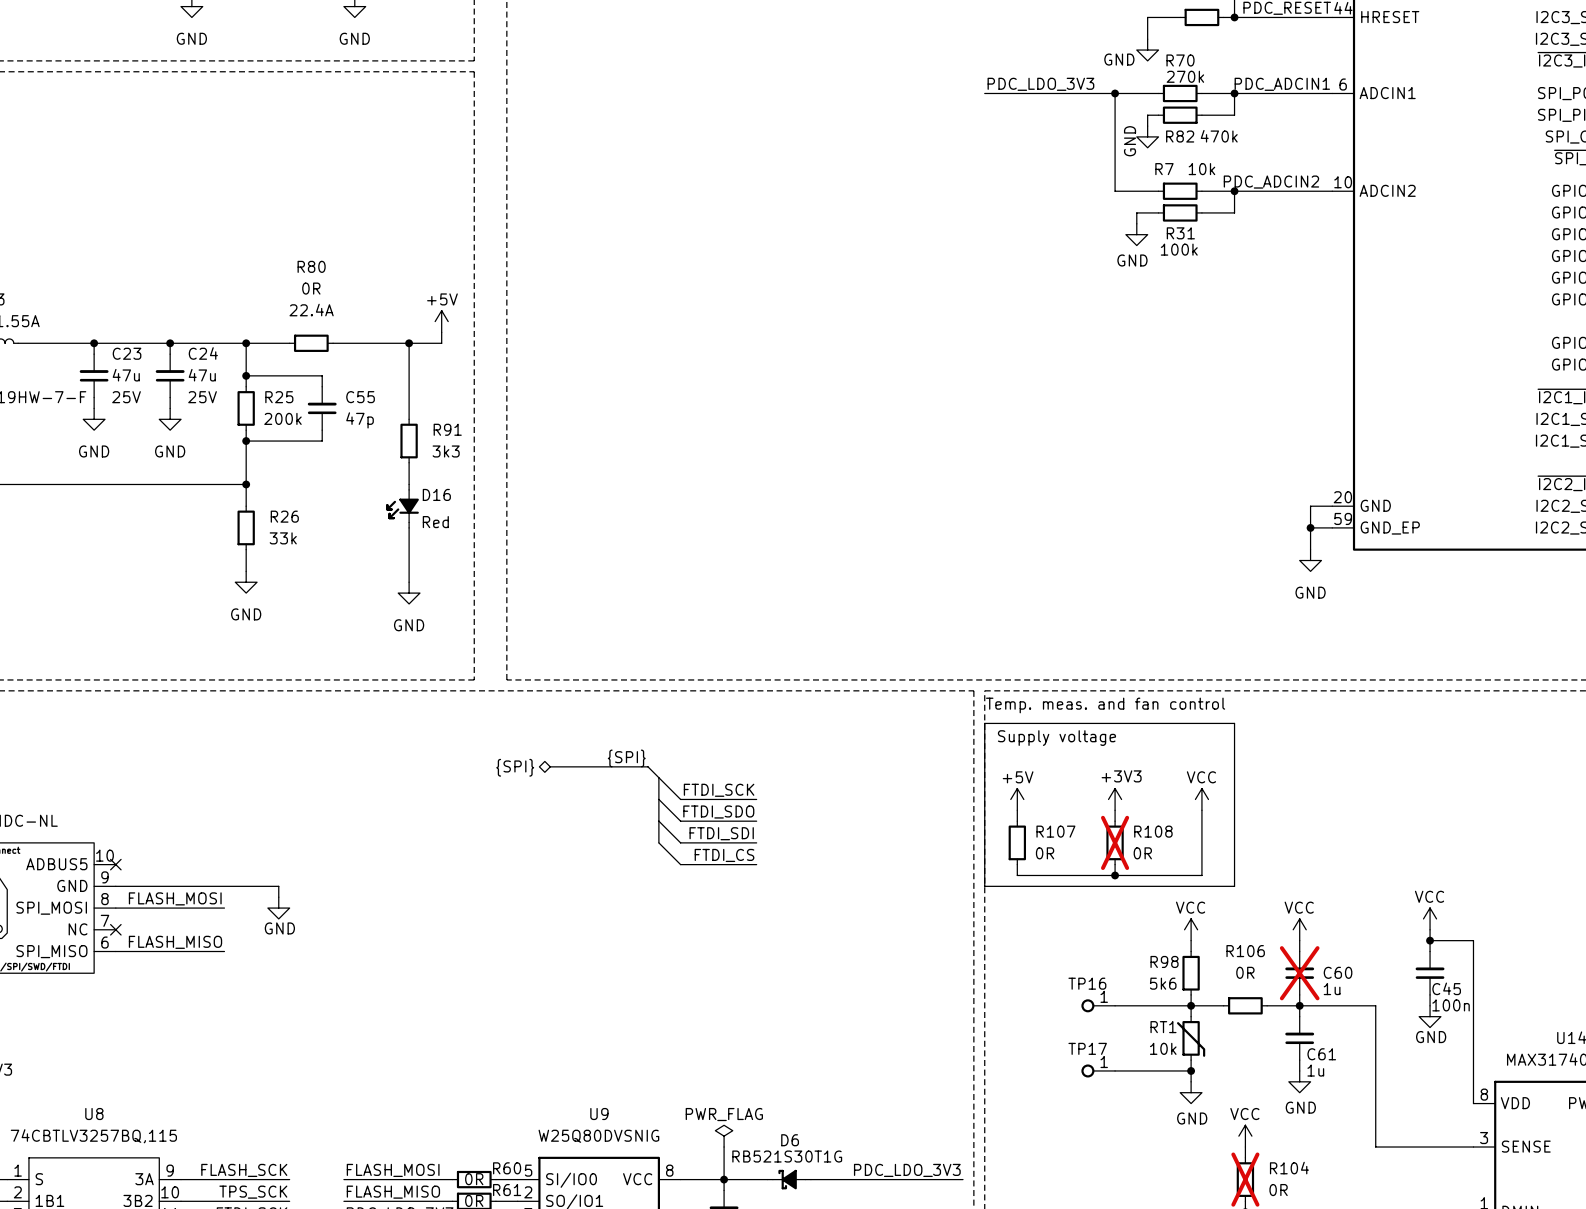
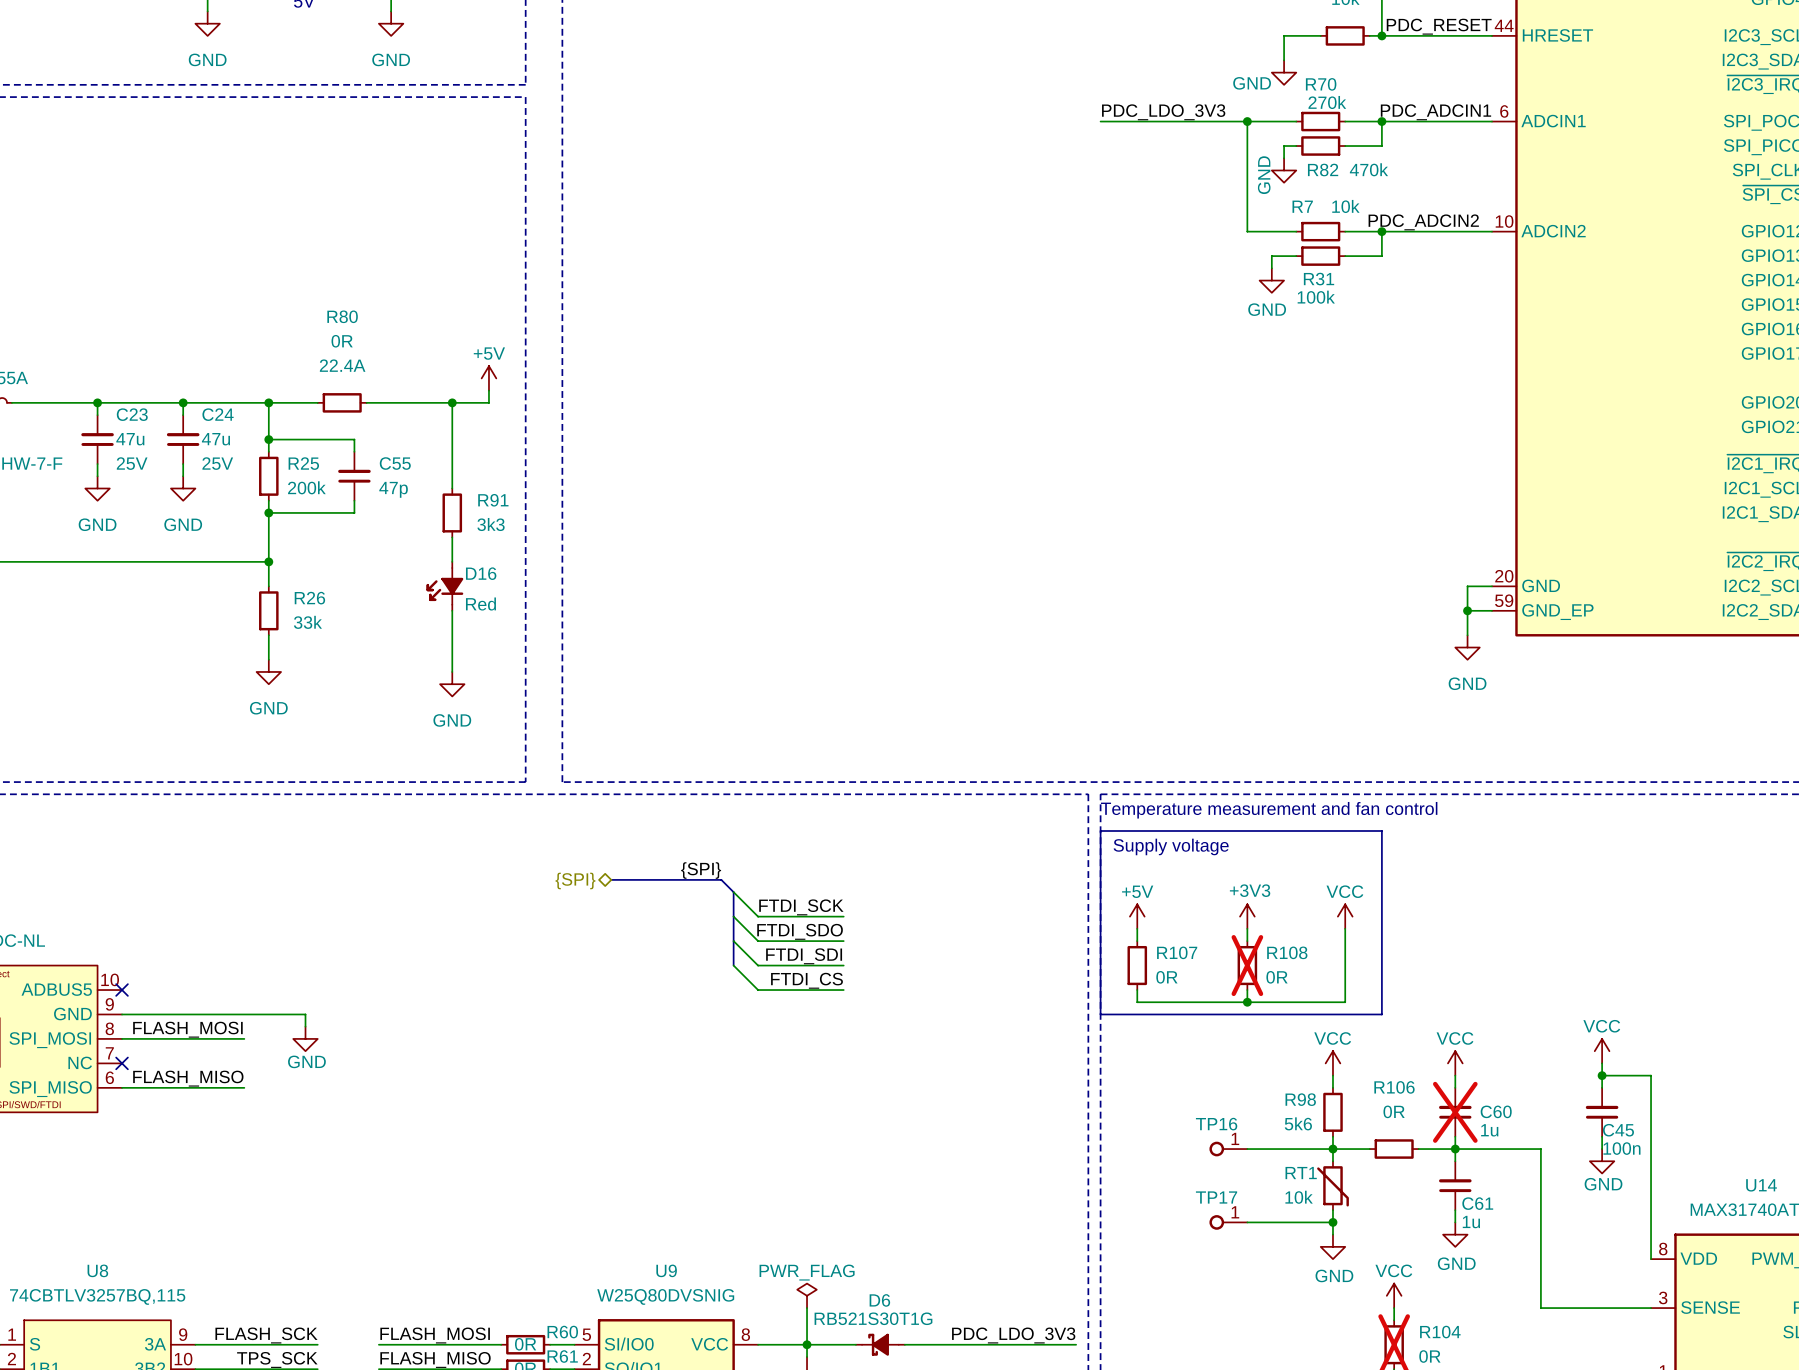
text: Temp. meas. and fan control (1105, 705) -> Temperature measurement and fan control (1269, 810)

